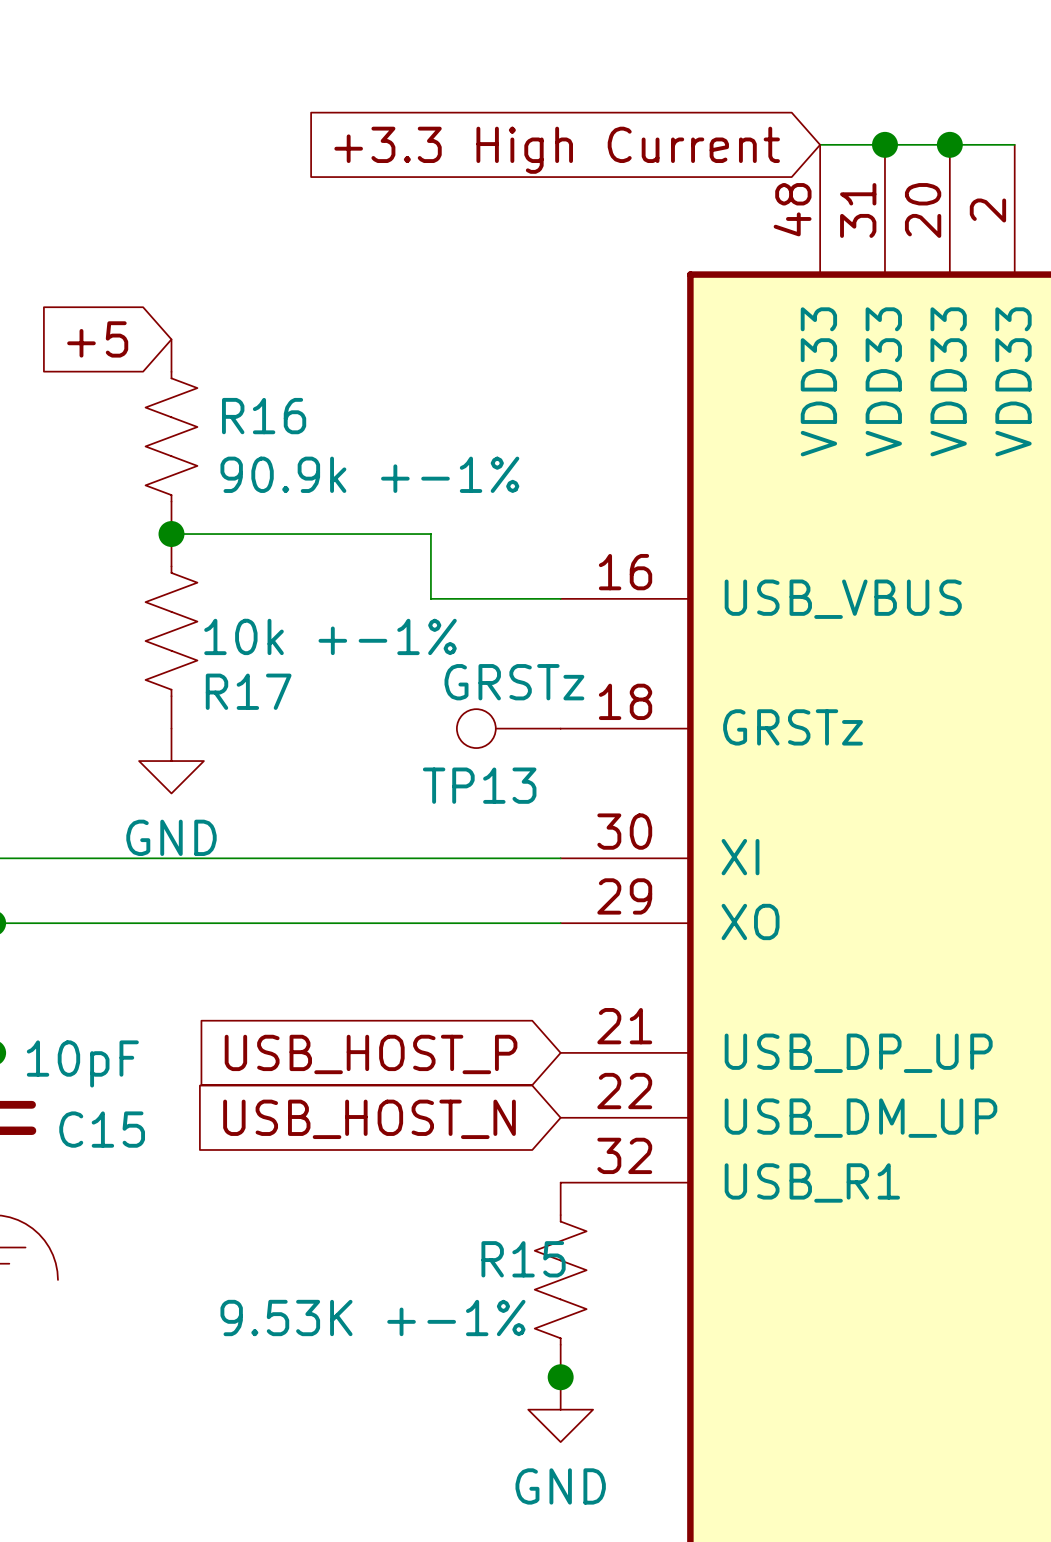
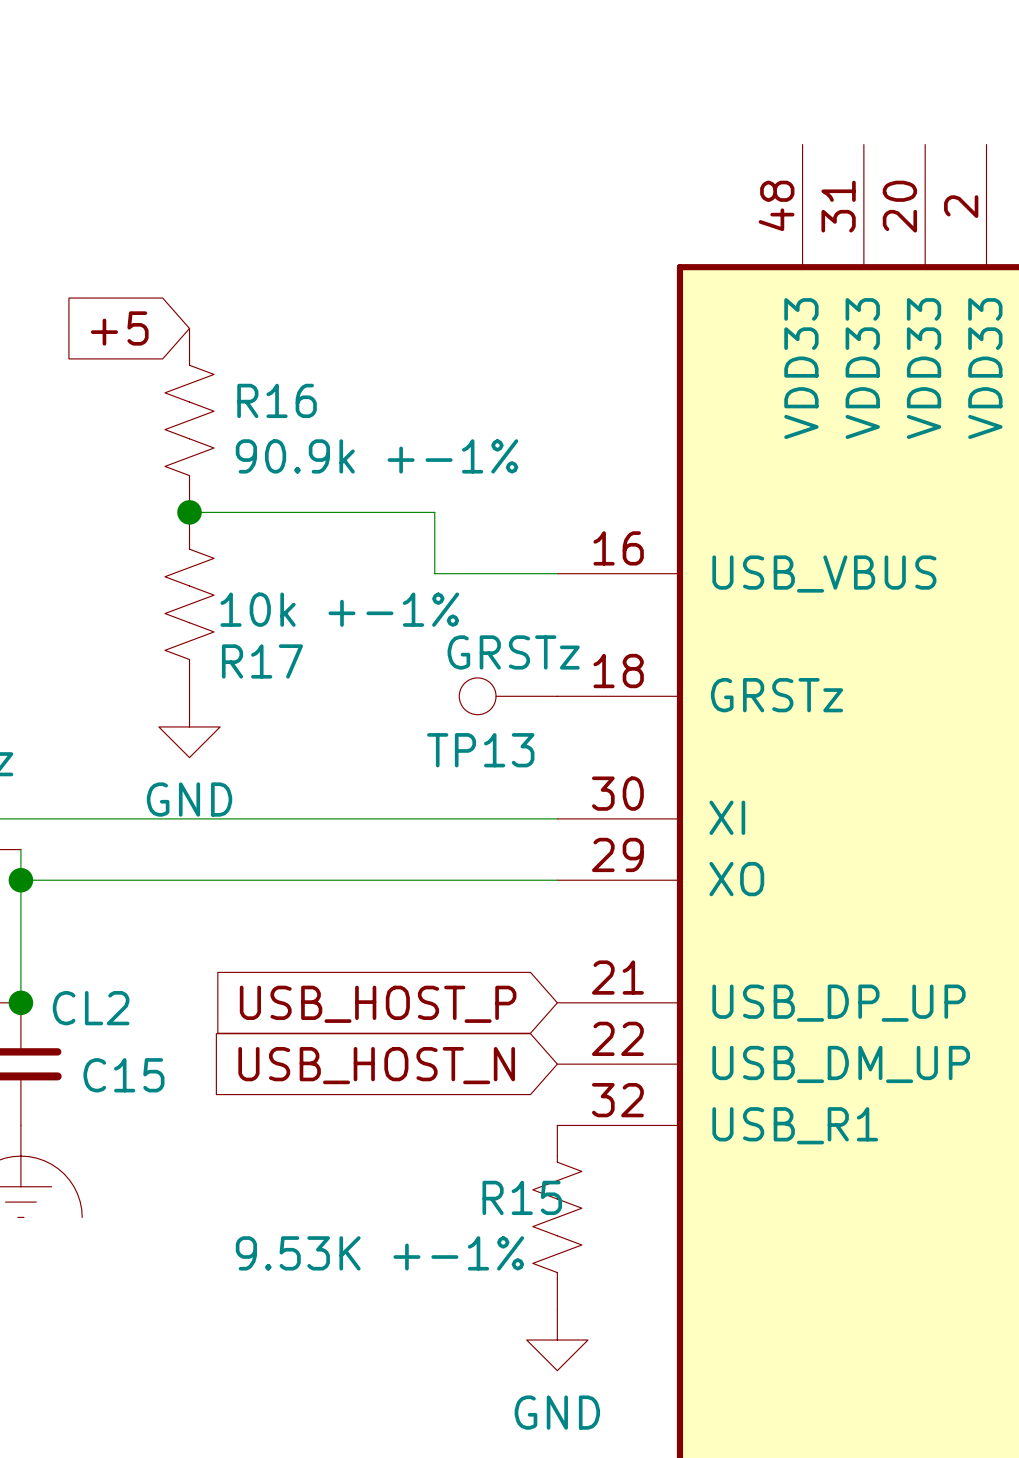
wire: (820, 144) (1014, 144) -> none
junction: (884, 144) -> none
junction: (949, 144) -> none
global label: +3.3 High Current (557, 150) -> none
C15 value: 10pF (82, 1063) -> CL2 (91, 1008)
junction: (560, 1377) -> none

